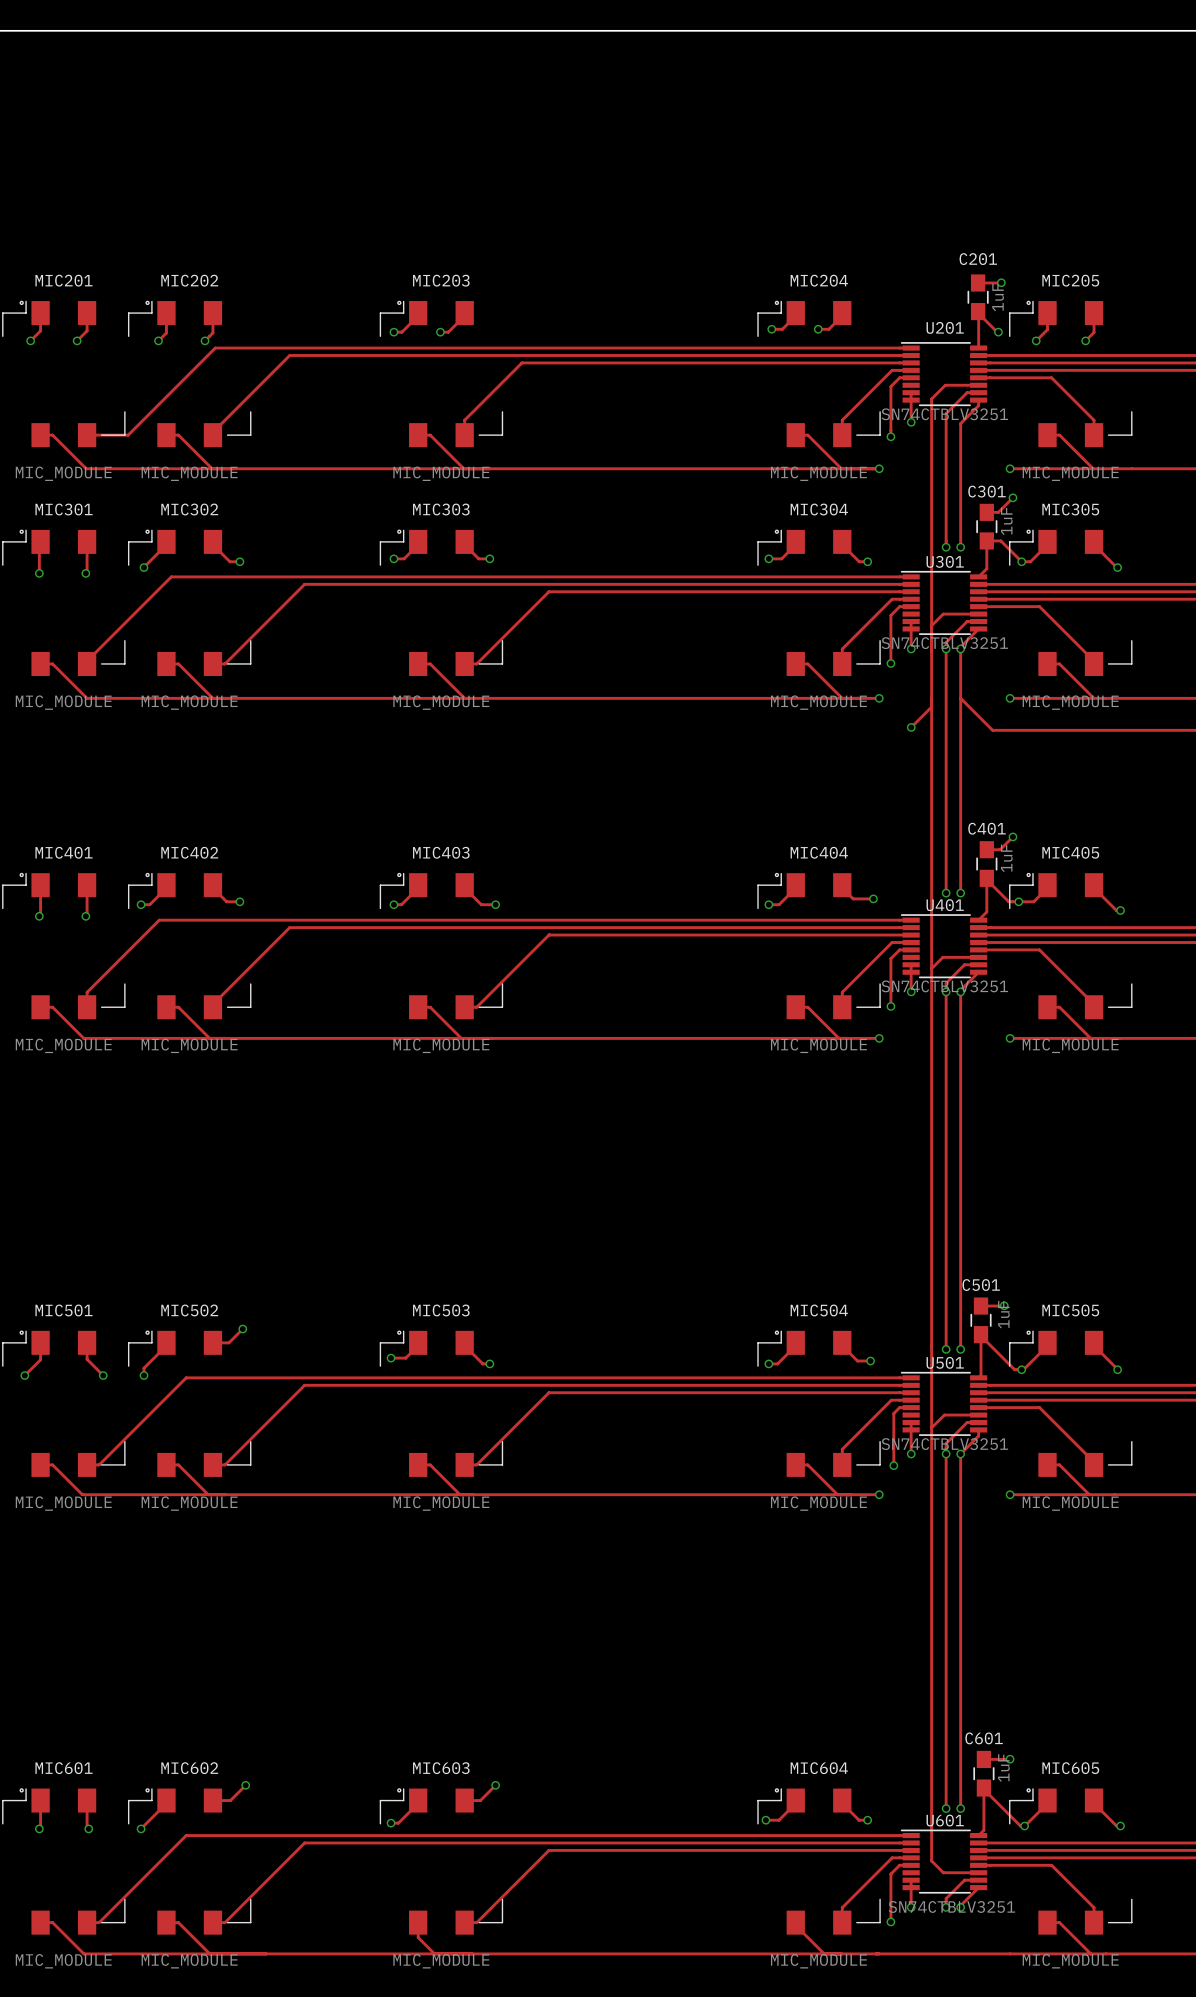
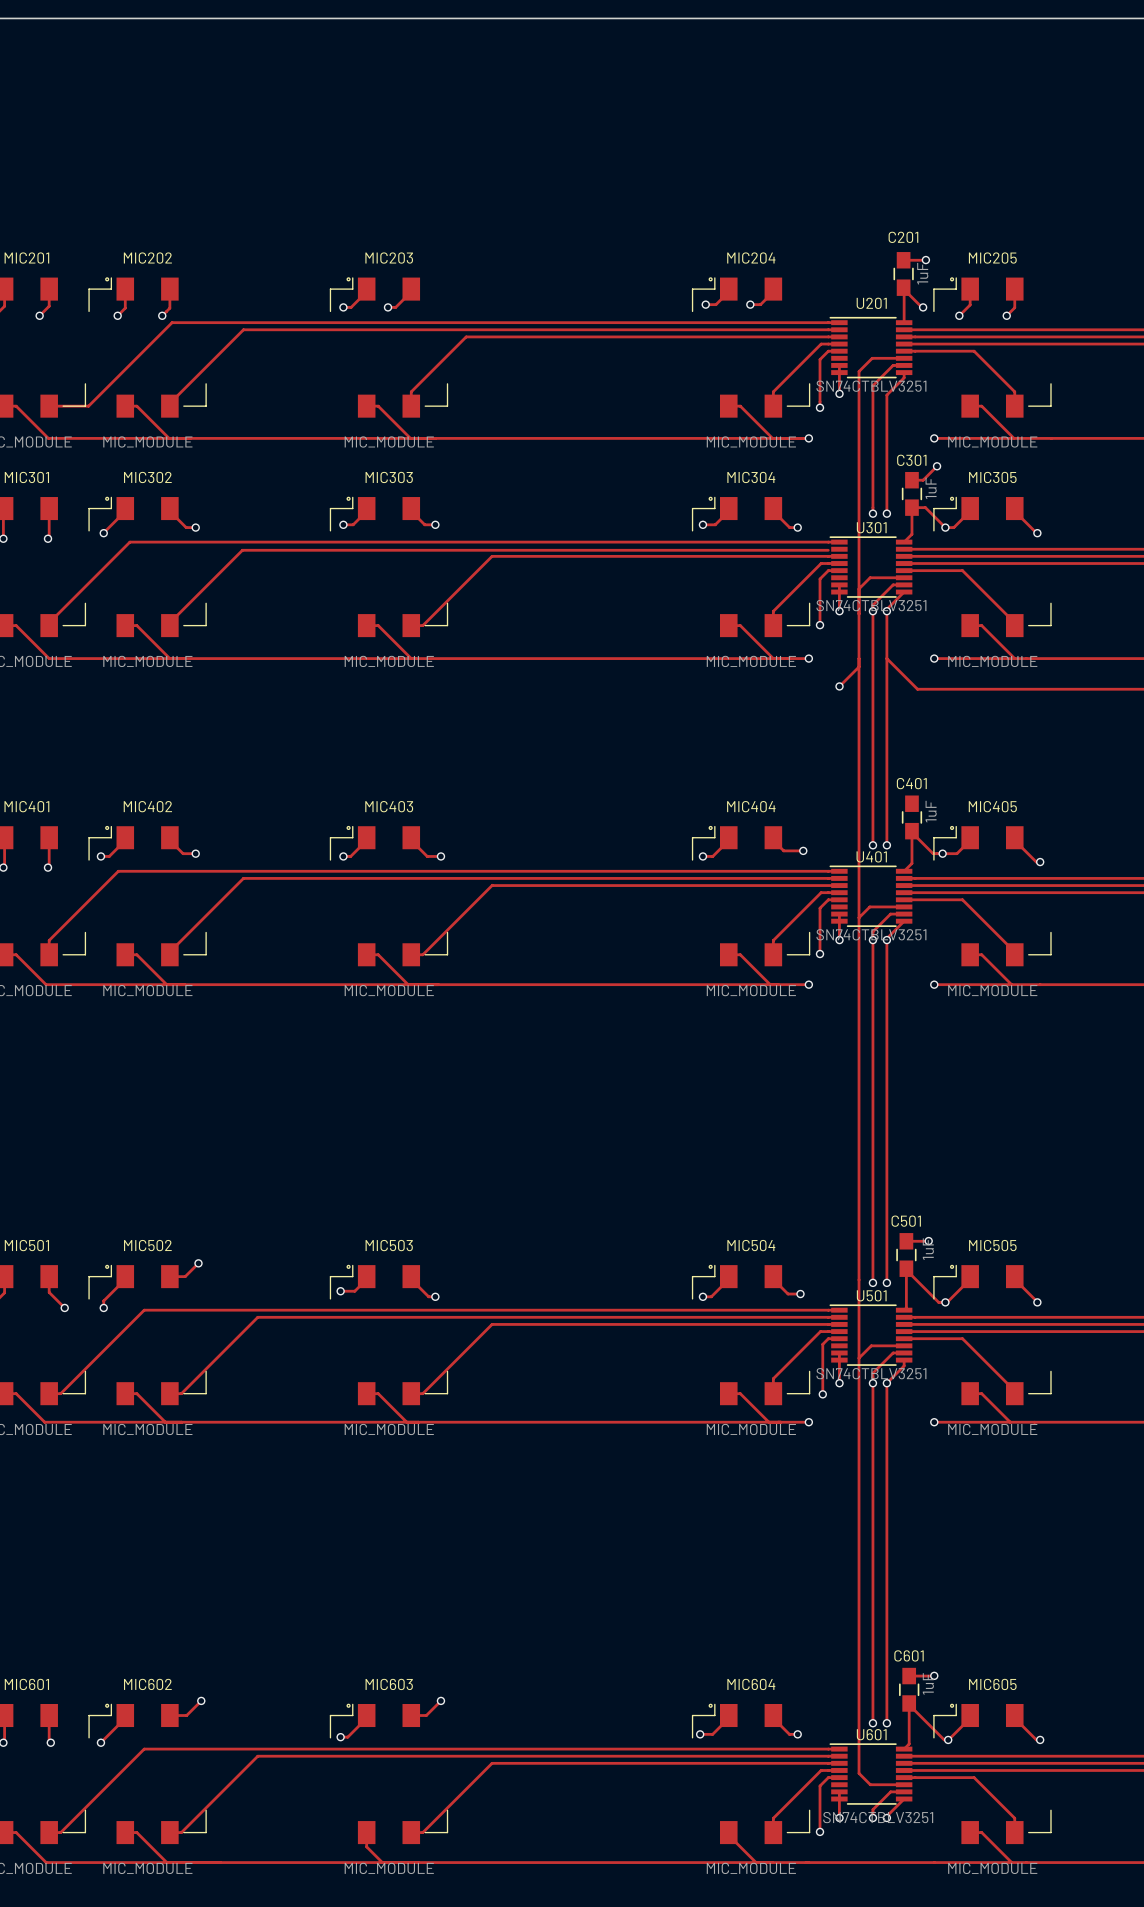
track: (911, 584) (304, 584) (225, 663) (212, 663) -> none
track: none -> (828, 550) (242, 550) (169, 622)
track: (1012, 836) (1000, 849) (986, 849) -> none
via: (1012, 836) -> none

